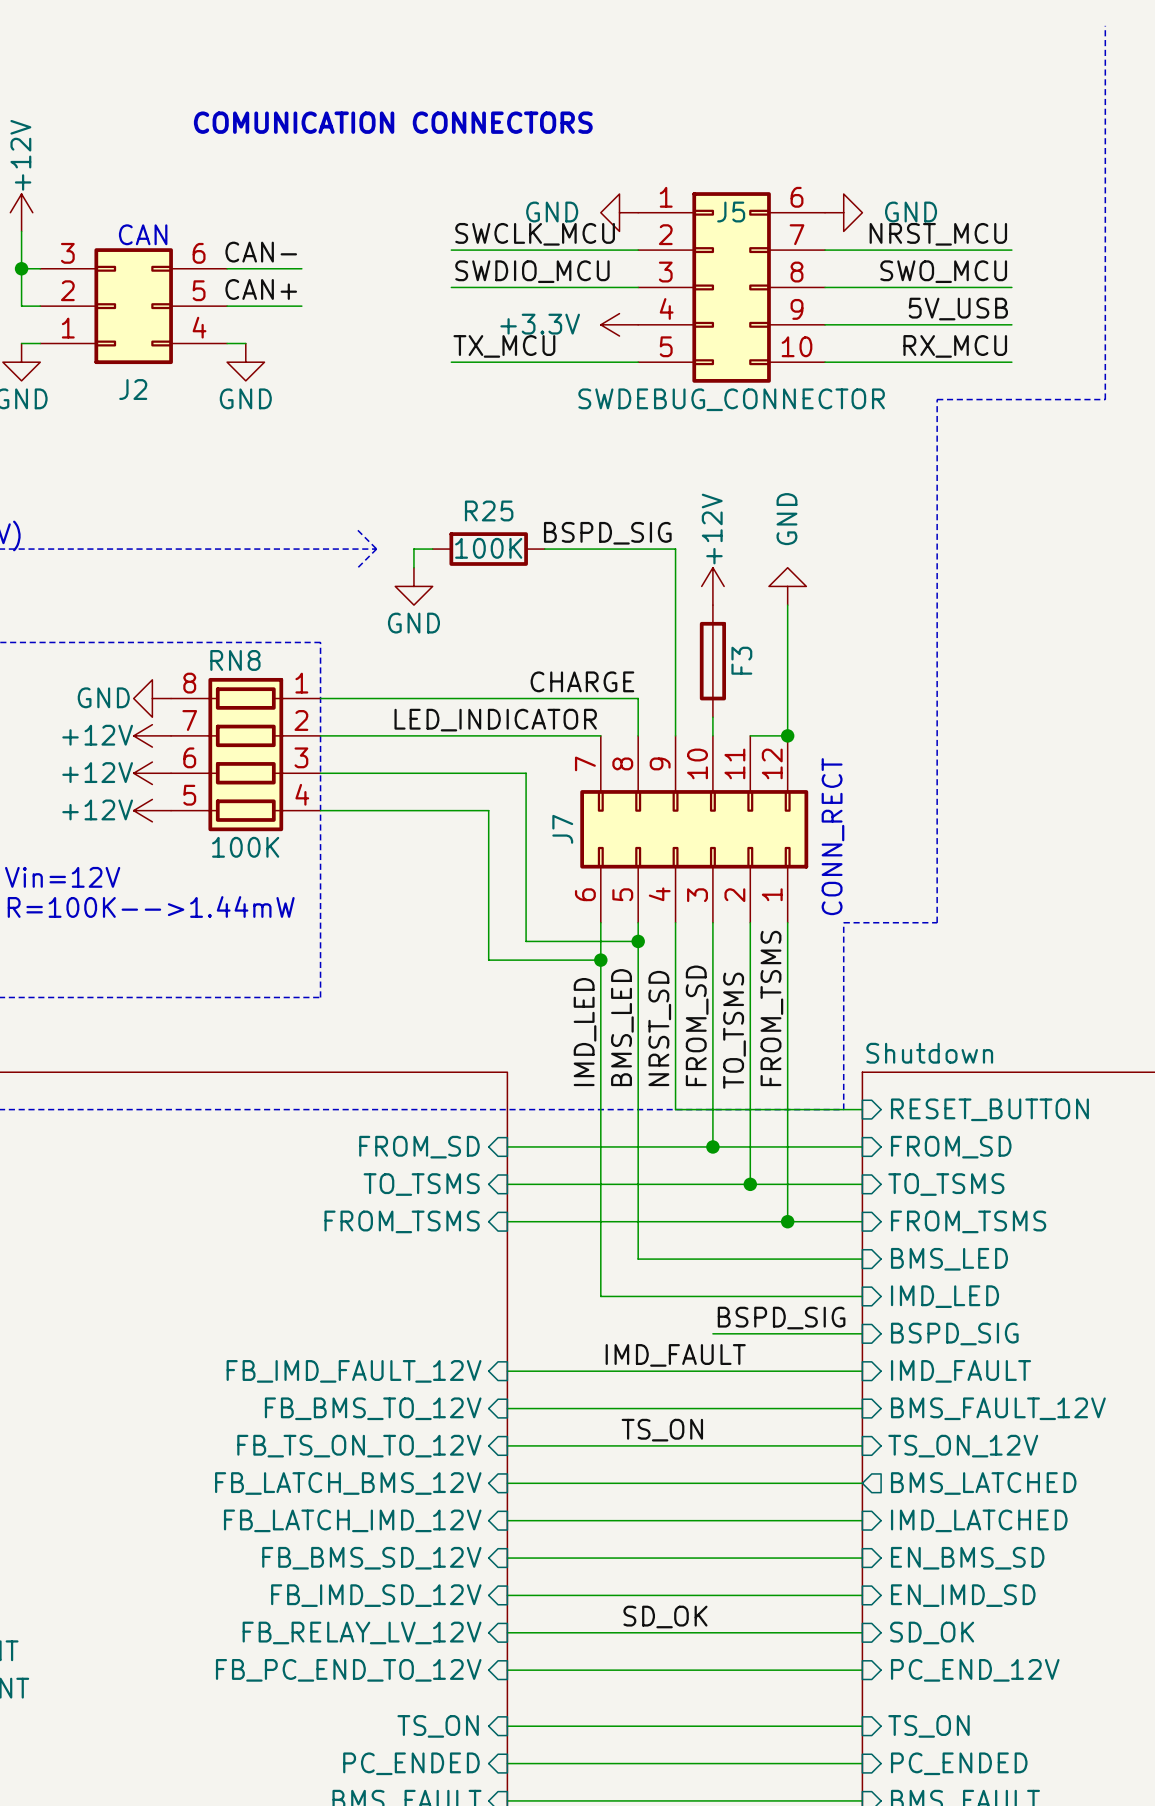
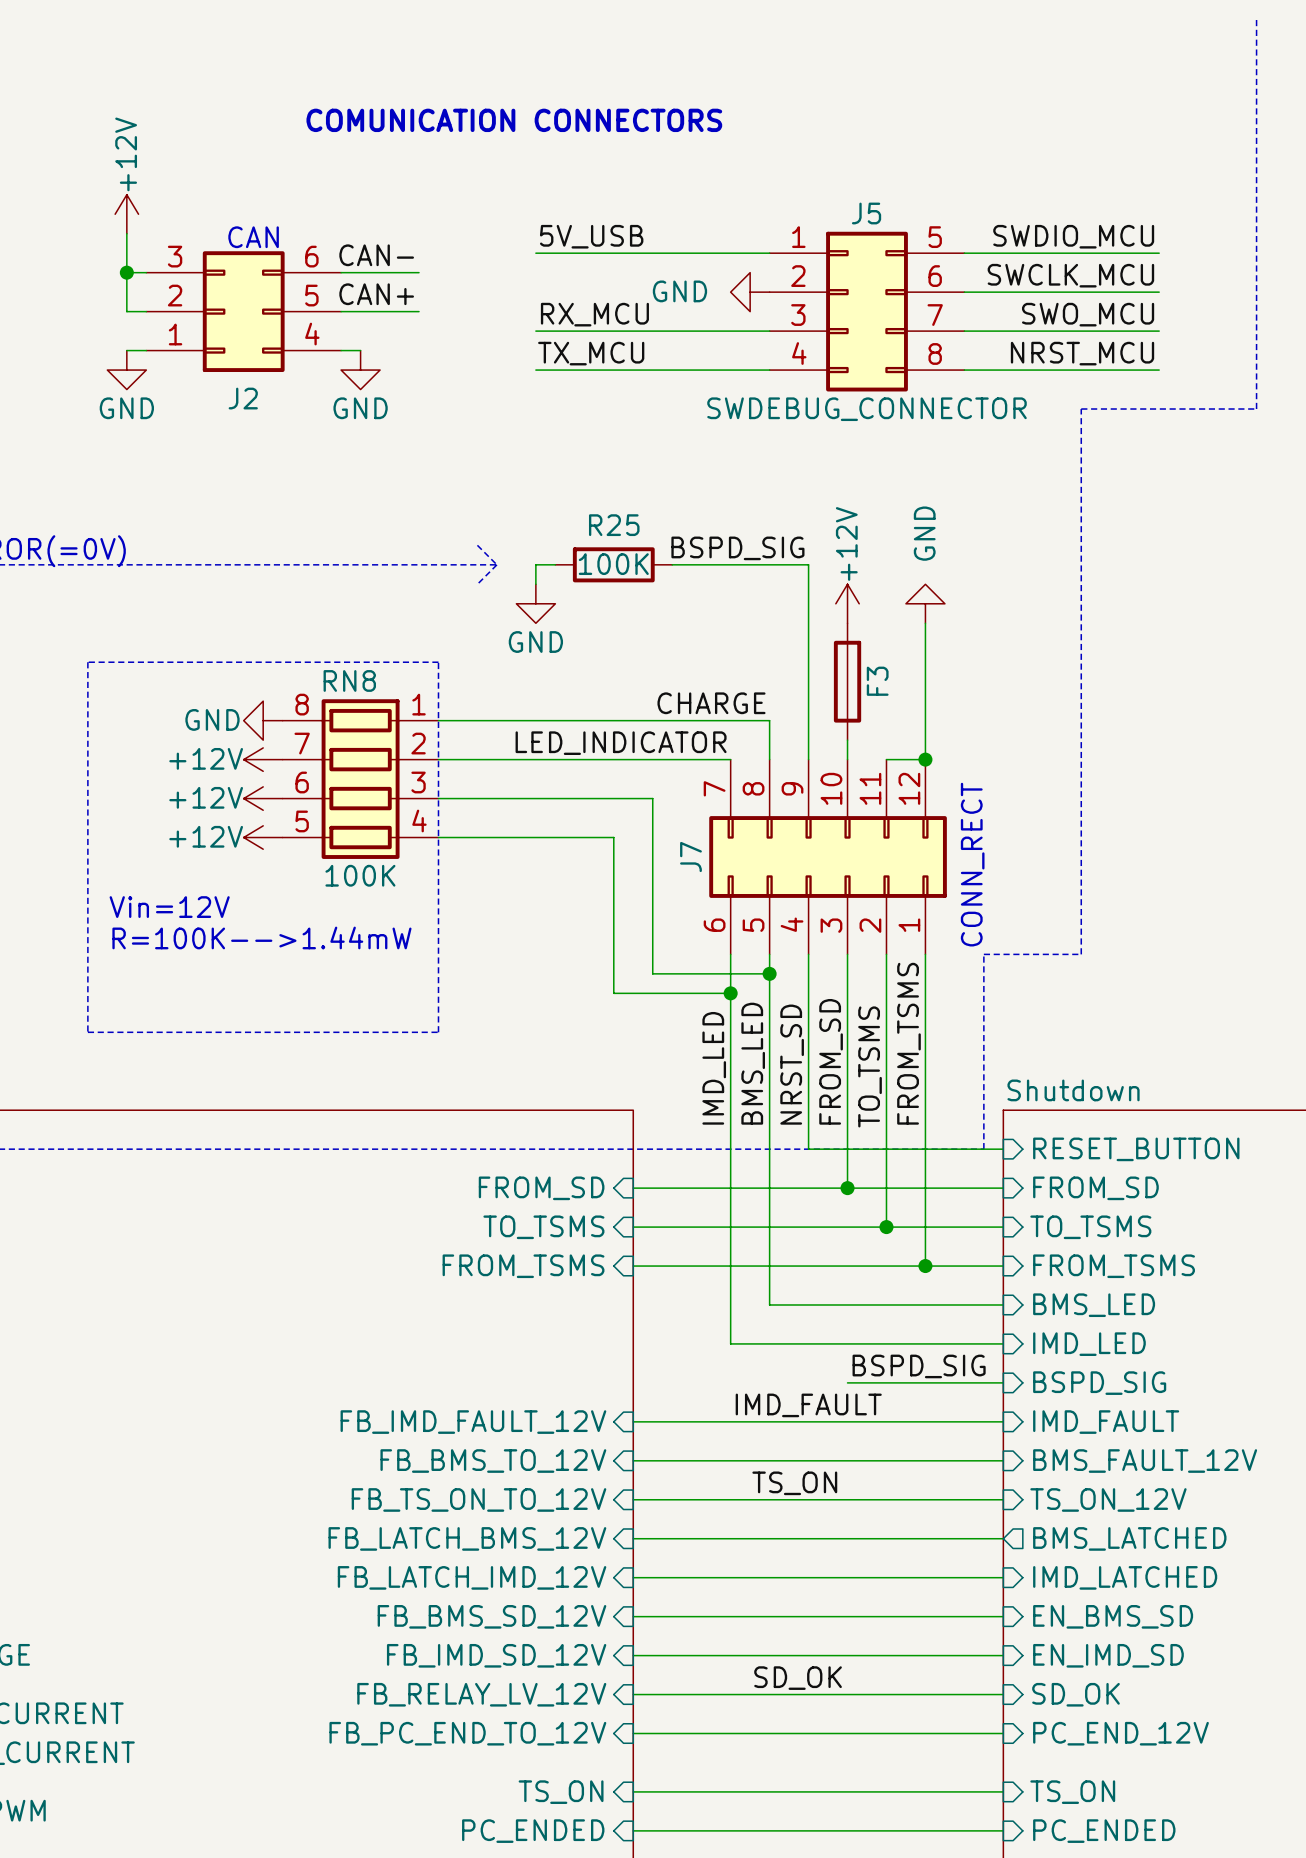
J5 symbol: [638, 192, 826, 383] -> [769, 231, 965, 392]
power symbol position: GND (619, 212) -> GND (750, 292)
power symbol: GND (843, 212) -> none
label: none -> 5V_USB (591, 236)
label: SWCLK_MCU (535, 234) -> none
label: NRST_MCU (938, 234) -> SWDIO_MCU (1073, 236)
wire: none -> (535, 253) (574, 253)
label: SWDIO_MCU (532, 271) -> none
label: SWO_MCU (943, 271) -> SWCLK_MCU (1070, 275)
wire: (451, 287) (638, 287) -> none
label: none -> RX_MCU (594, 314)
label: 5V_USB (958, 309) -> SWO_MCU (1088, 314)
wire: none -> (535, 331) (769, 331)
power symbol: +3.3V (619, 324) -> none
label position: TX_MCU (504, 346) -> TX_MCU (591, 353)
label: RX_MCU (955, 346) -> NRST_MCU (1082, 353)
wire: none -> (535, 370) (574, 370)

